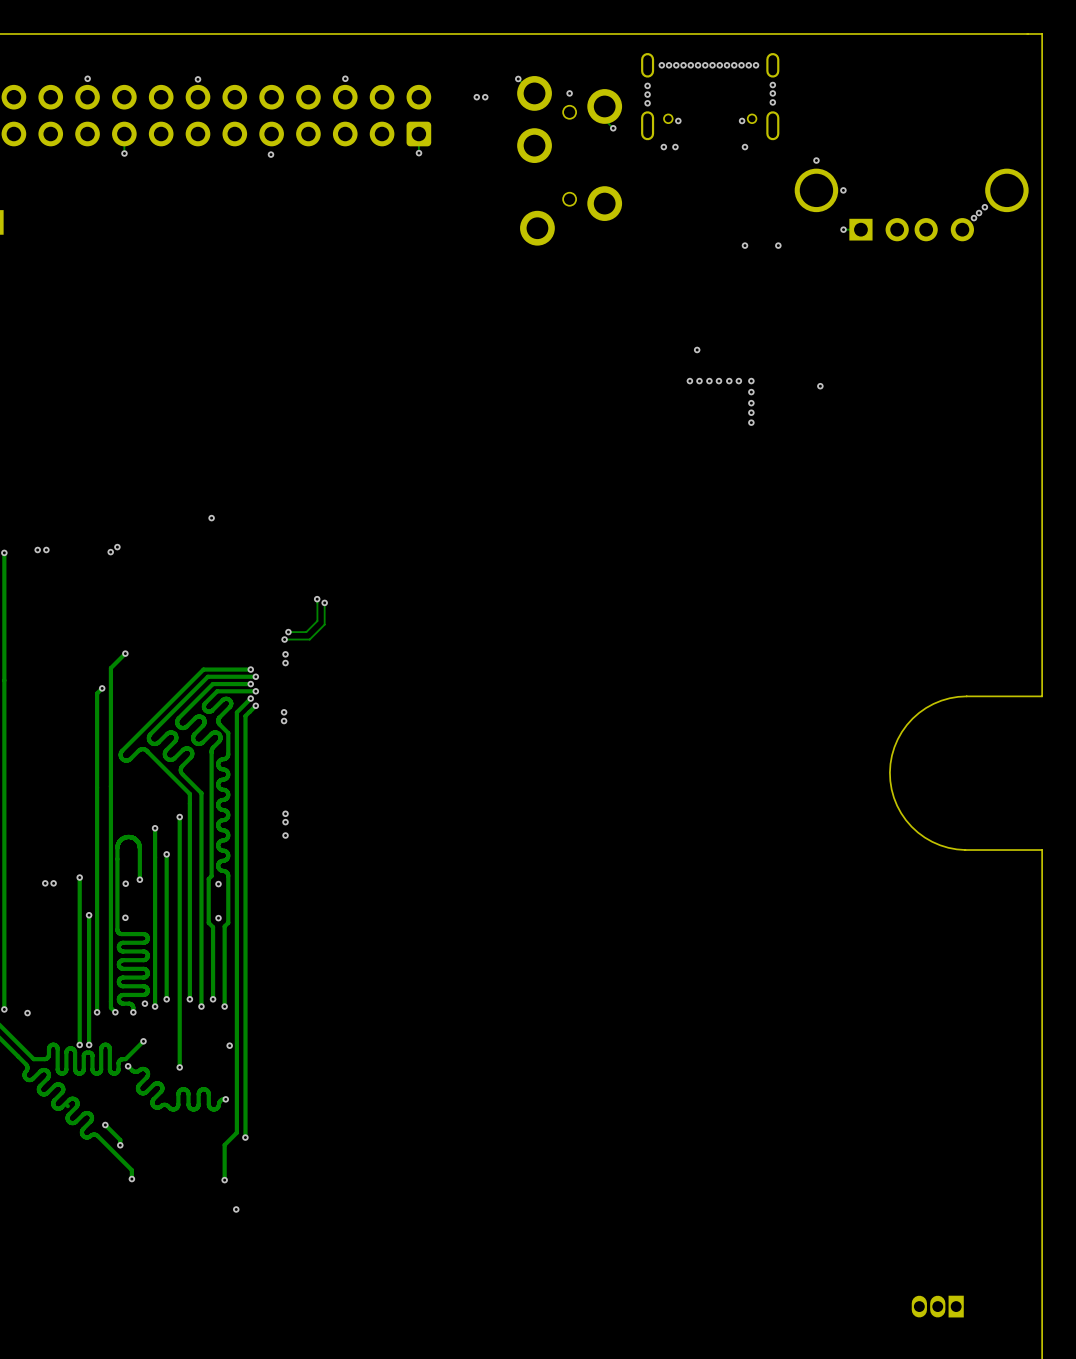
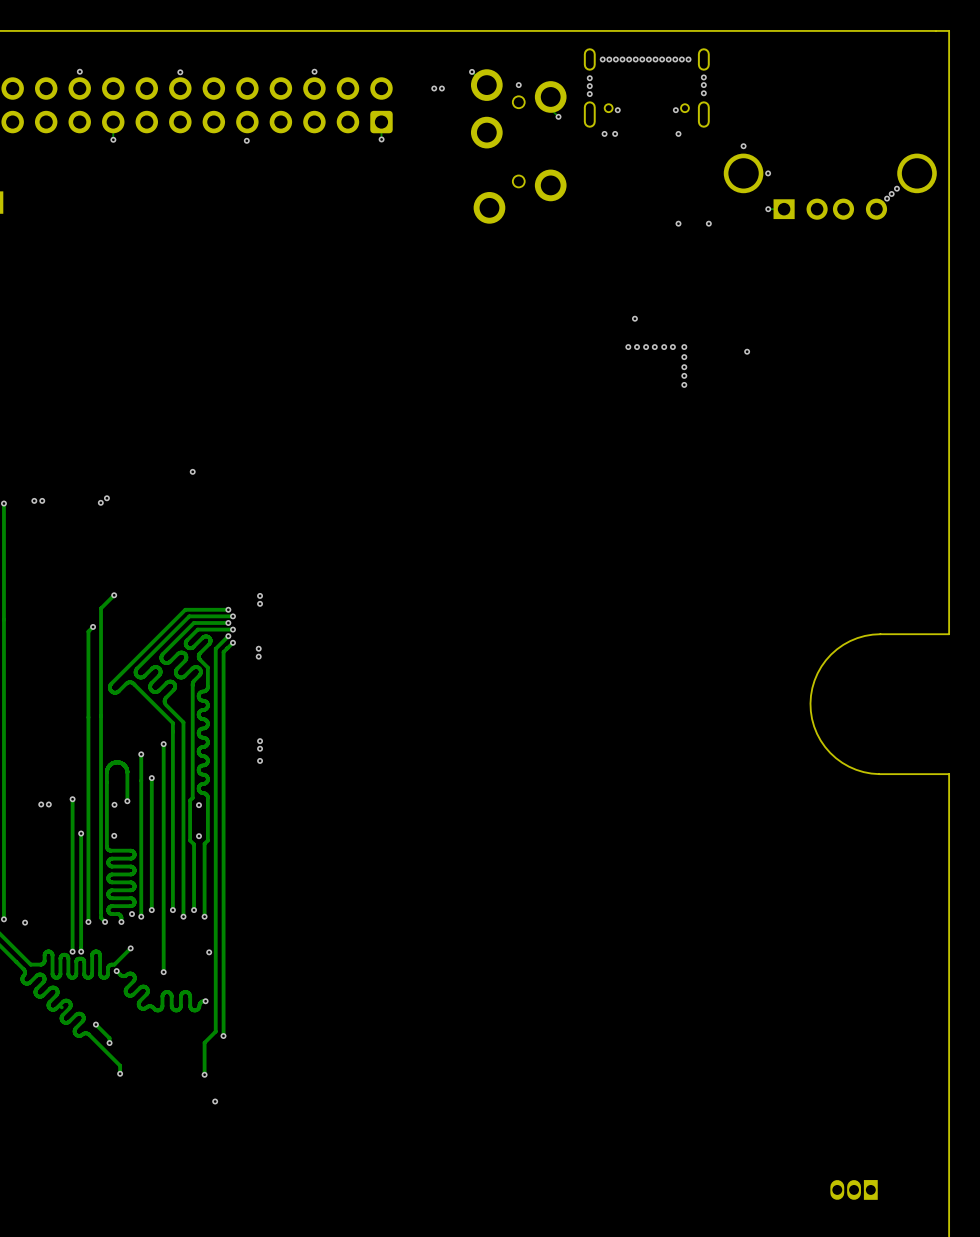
track: (317, 599) (317, 621) (306, 632) (288, 632) -> none
via: (317, 599) -> none
track: (324, 602) (324, 624) (309, 639) (284, 639) -> none
via: (324, 602) -> none
via: (288, 632) -> none
via: (284, 639) -> none

